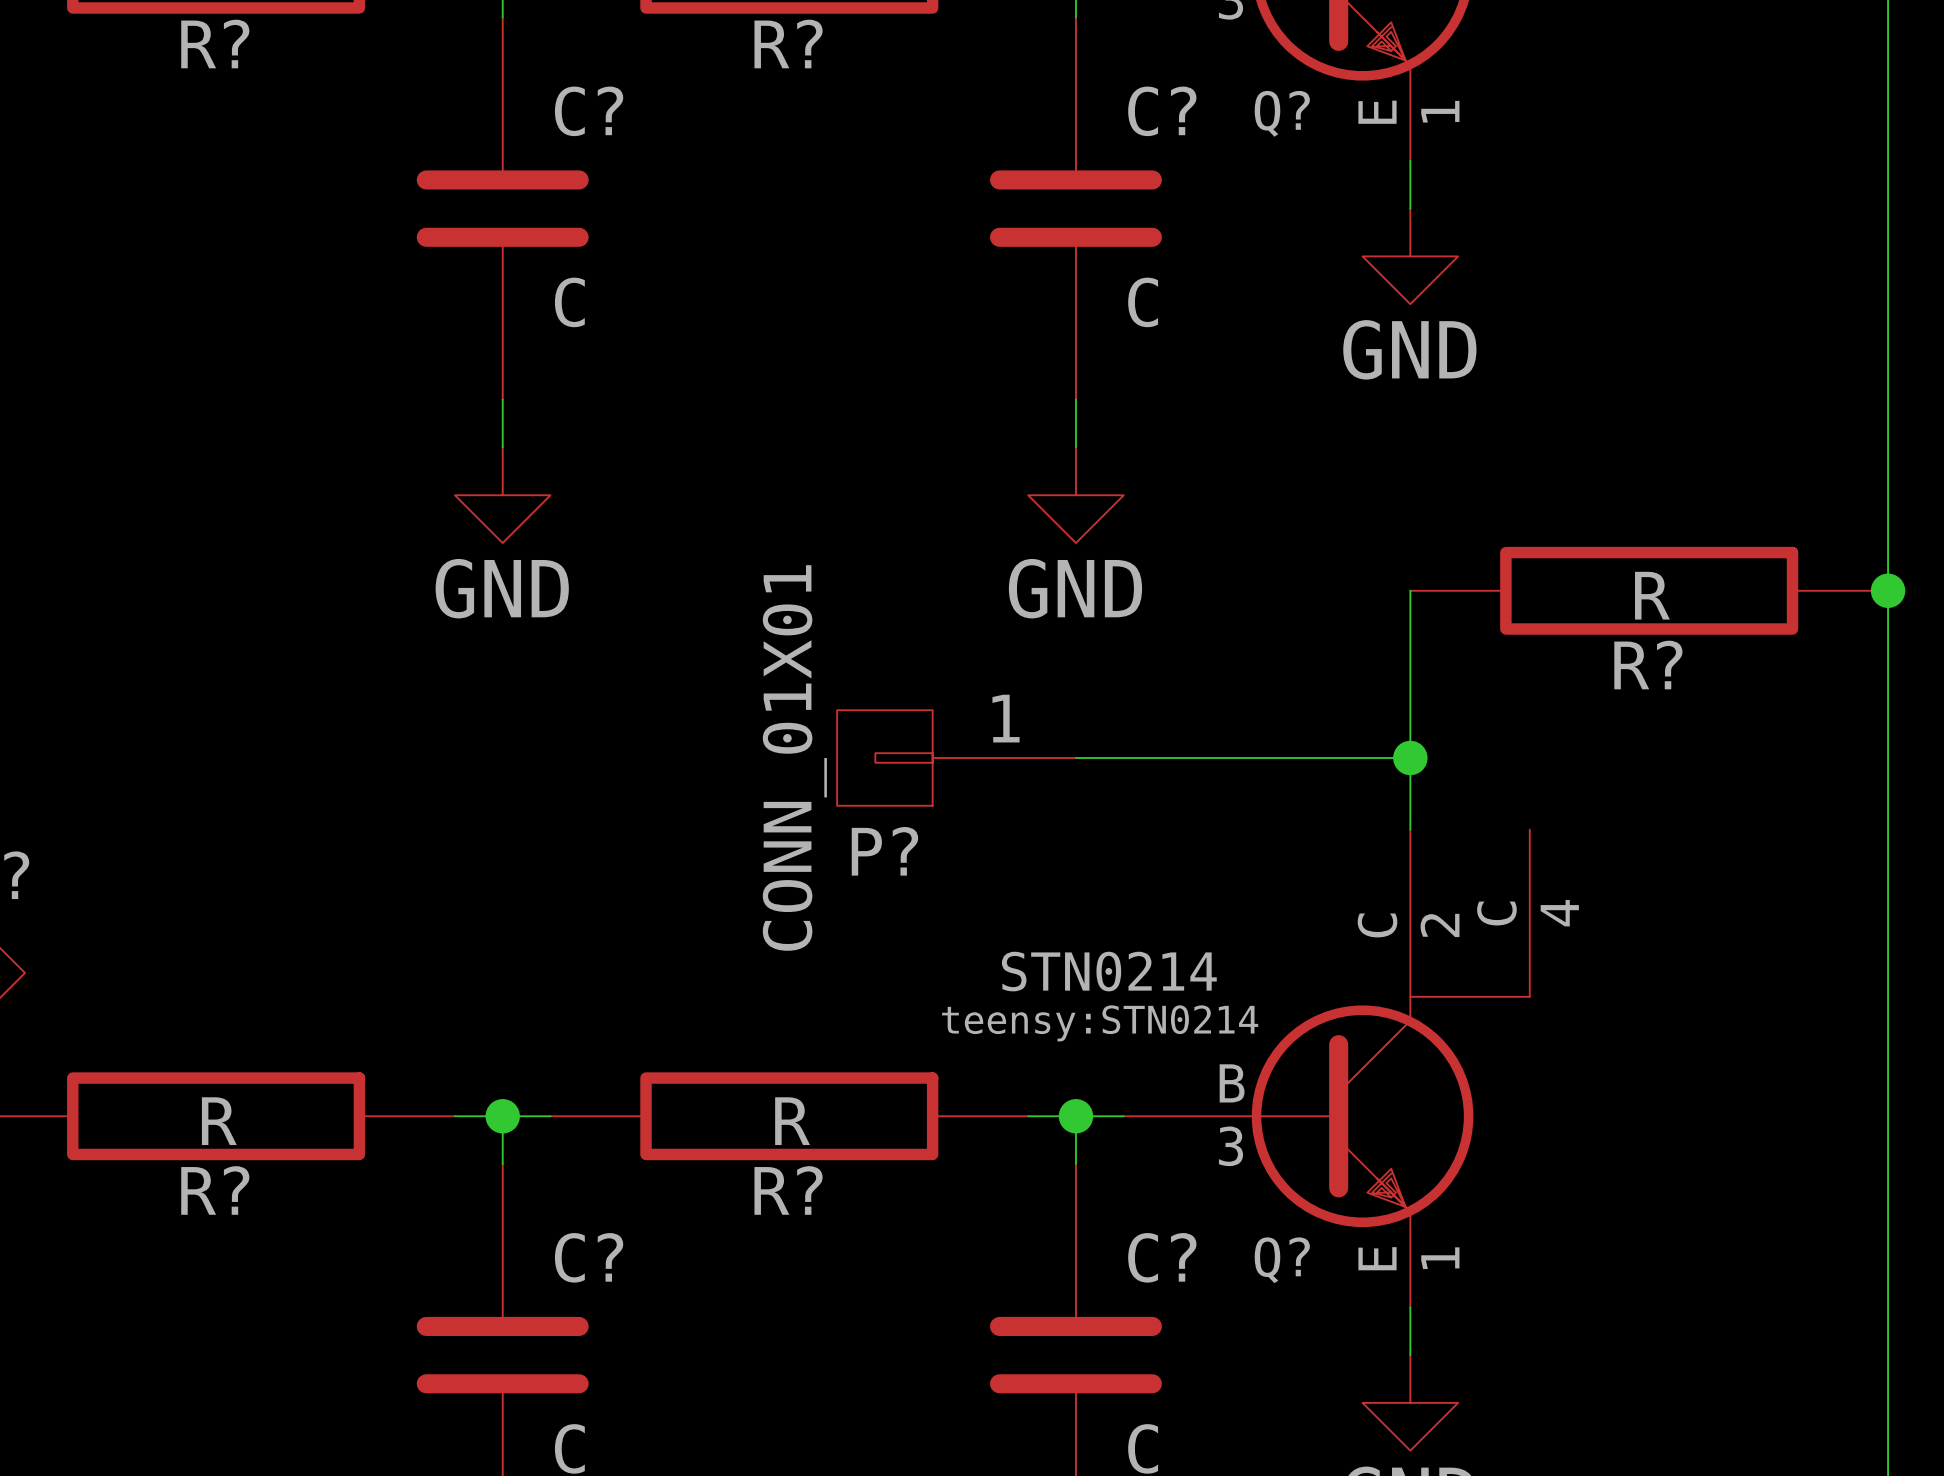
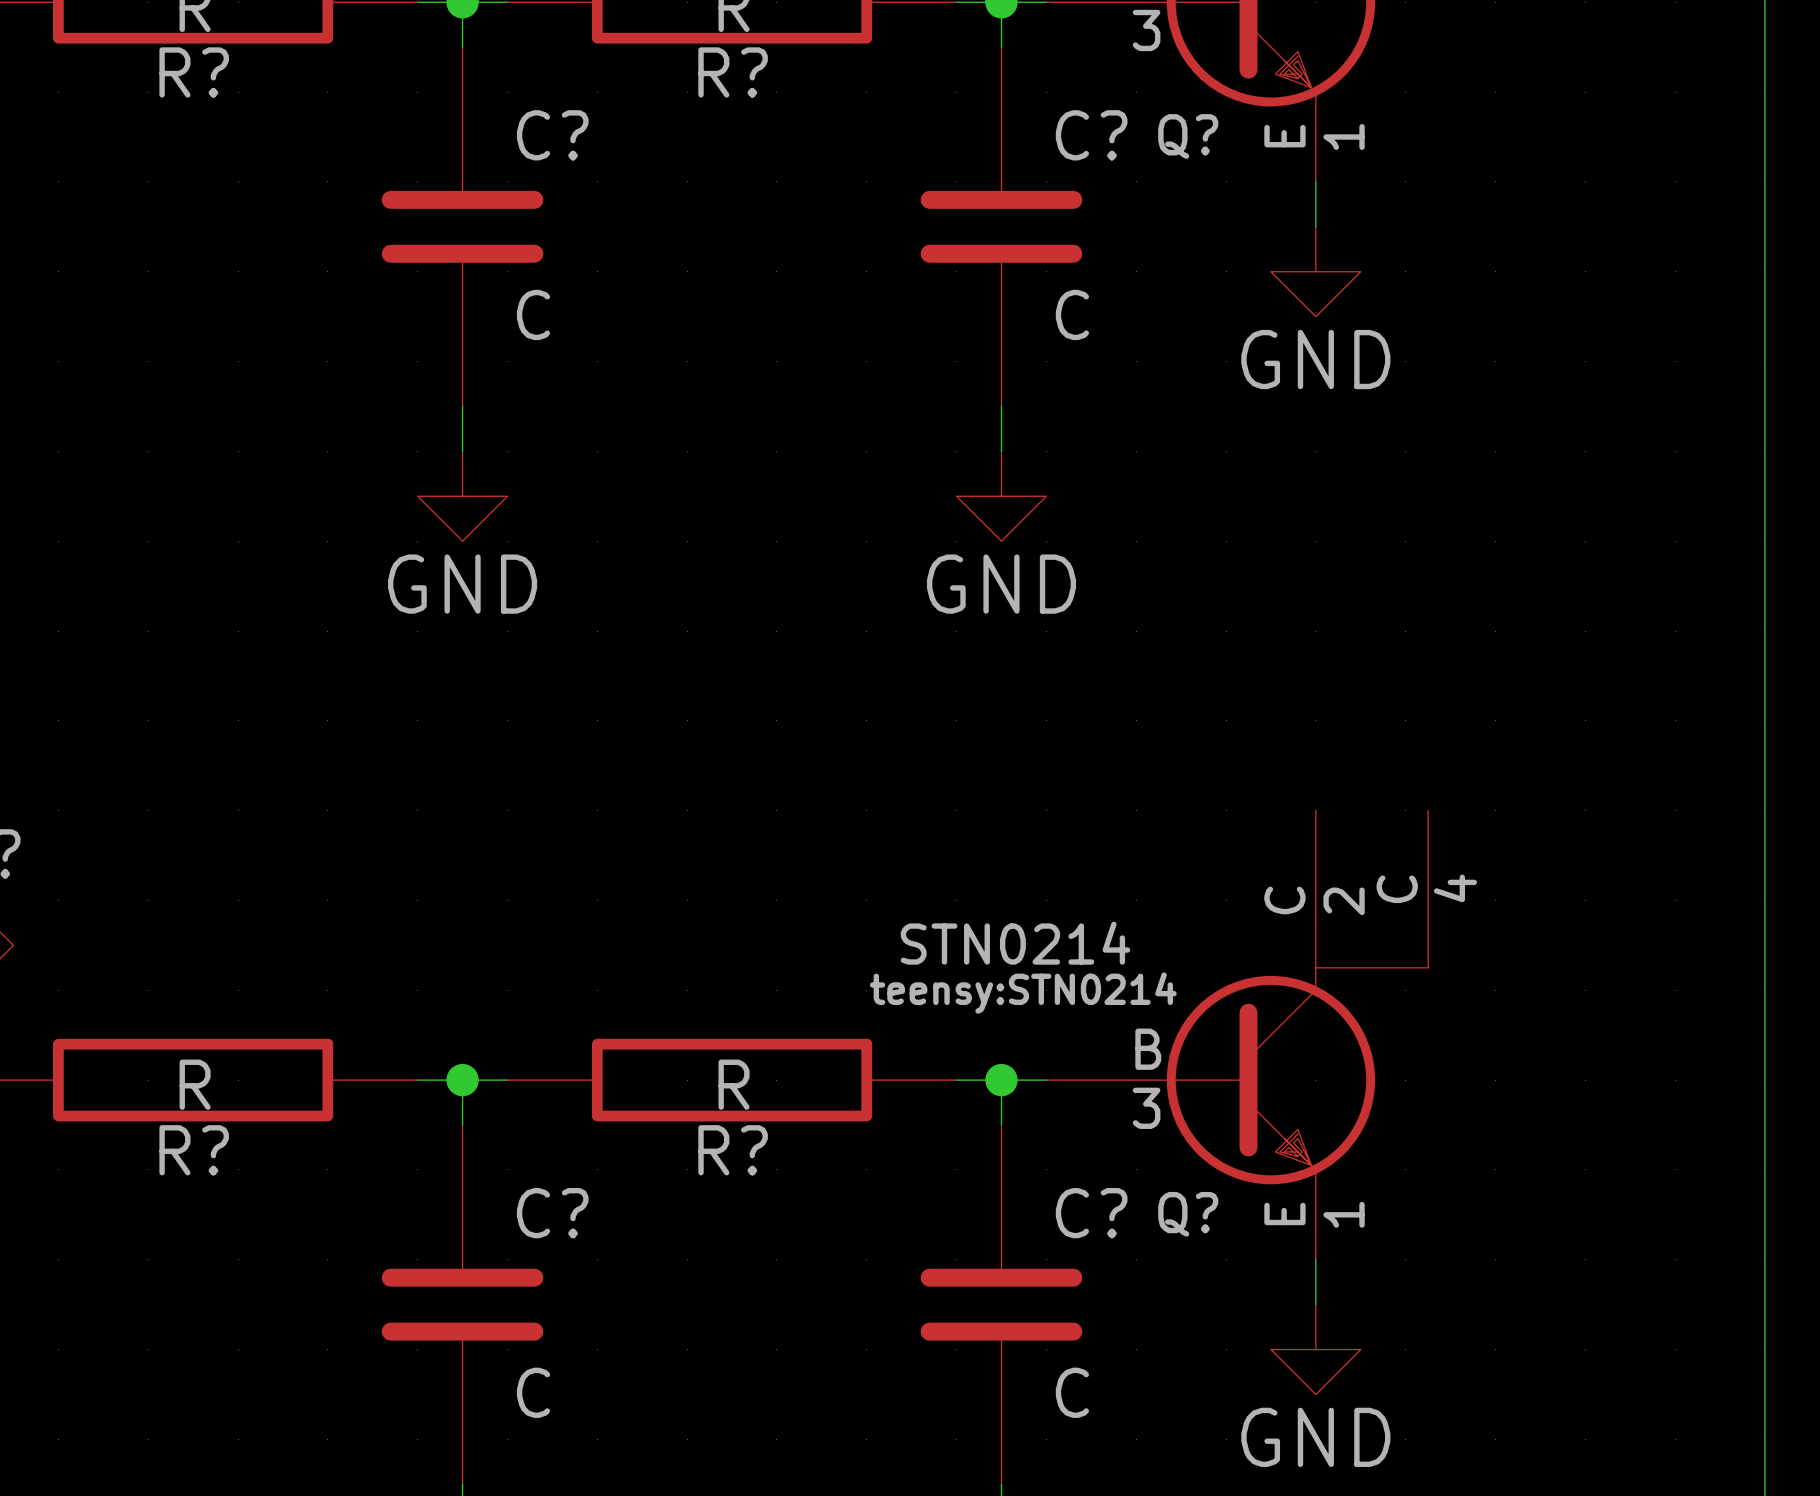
wire: (1410, 590) (1410, 829) -> none
R?: R (1649, 590) -> none
junction: (1888, 590) -> none
P?: CONN_01X01 (956, 757) -> none
wire: (1075, 757) (1410, 757) -> none
junction: (1410, 757) -> none

